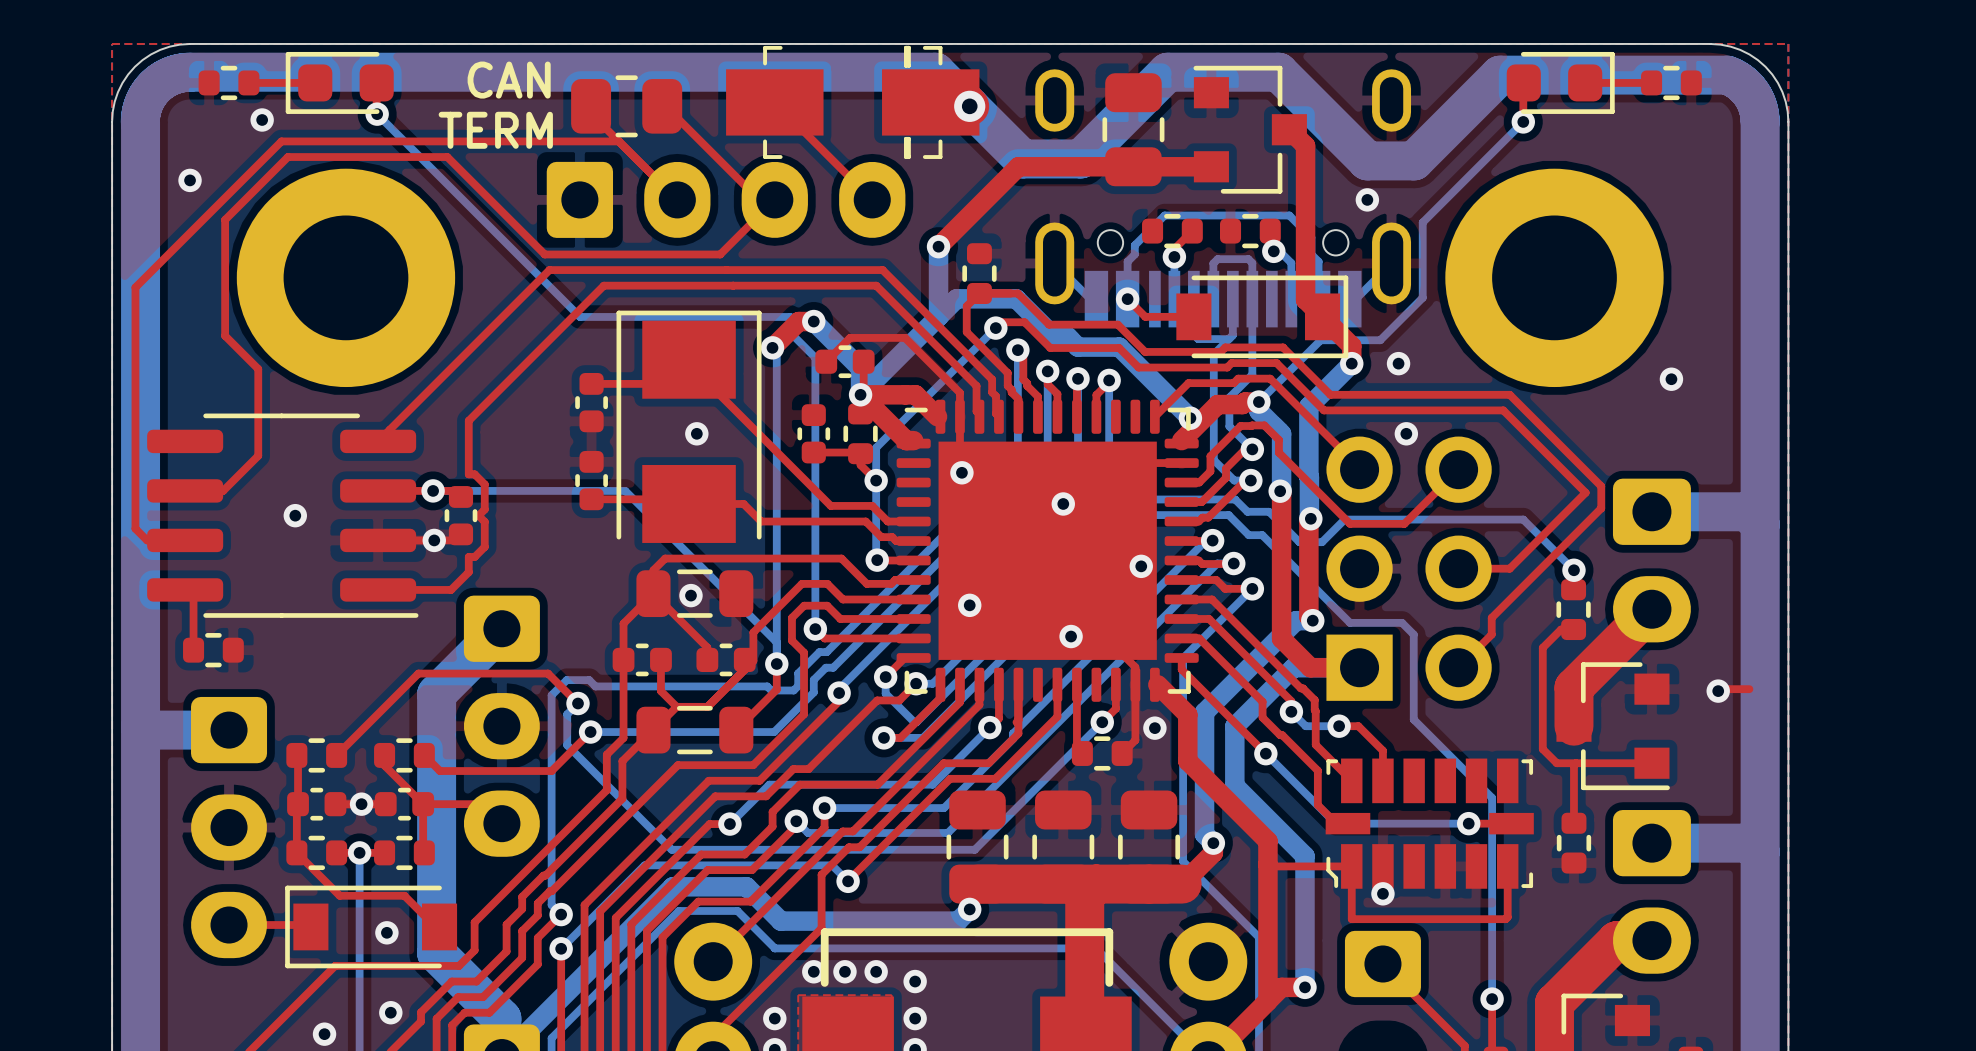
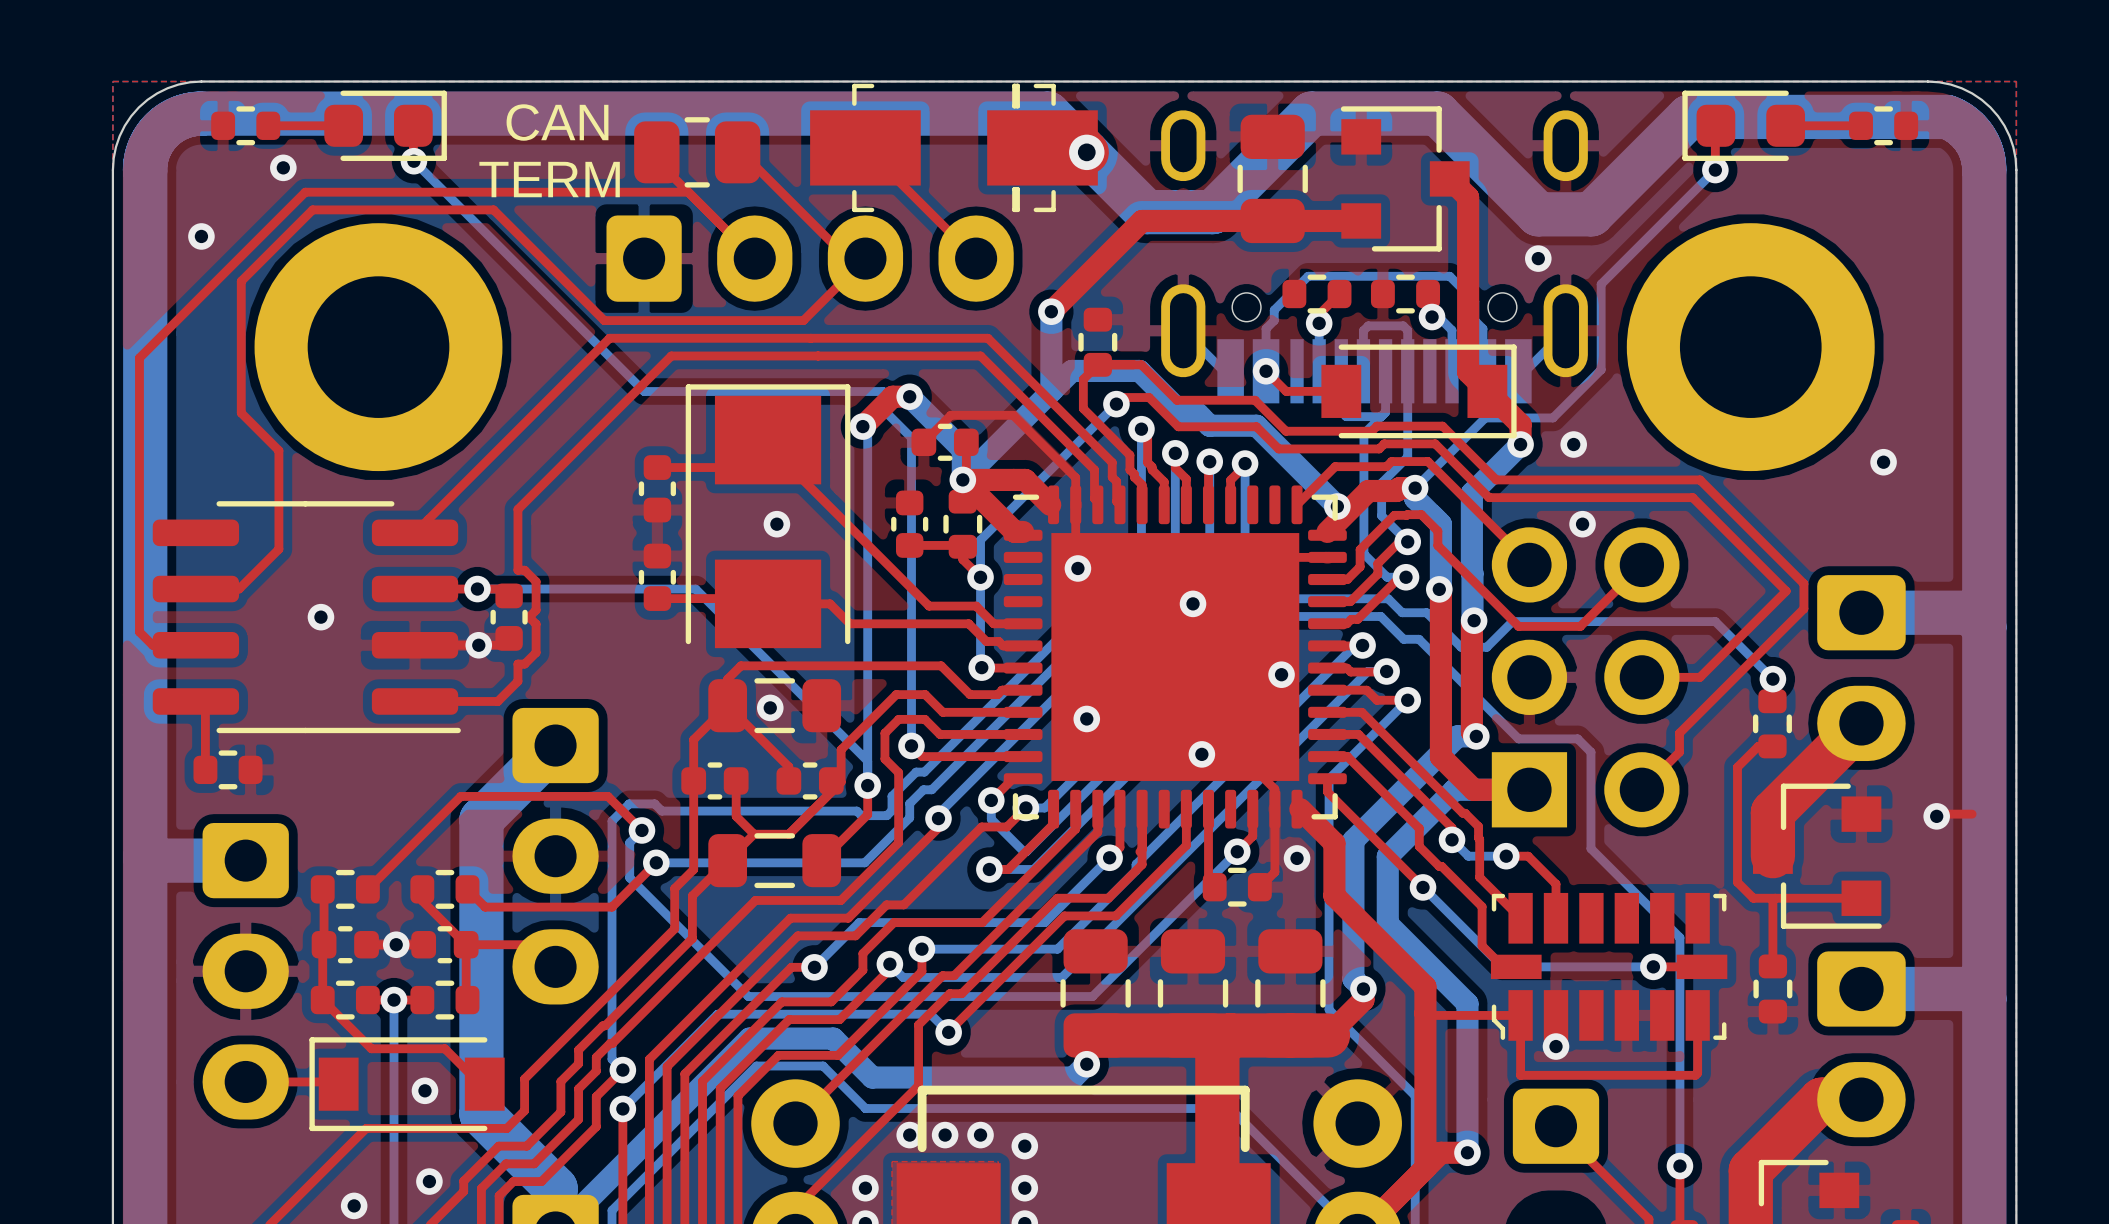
part rotation: 0° (339, 82) -> 180° (385, 125)
part rotation: 0° (1560, 82) -> 180° (1743, 125)

